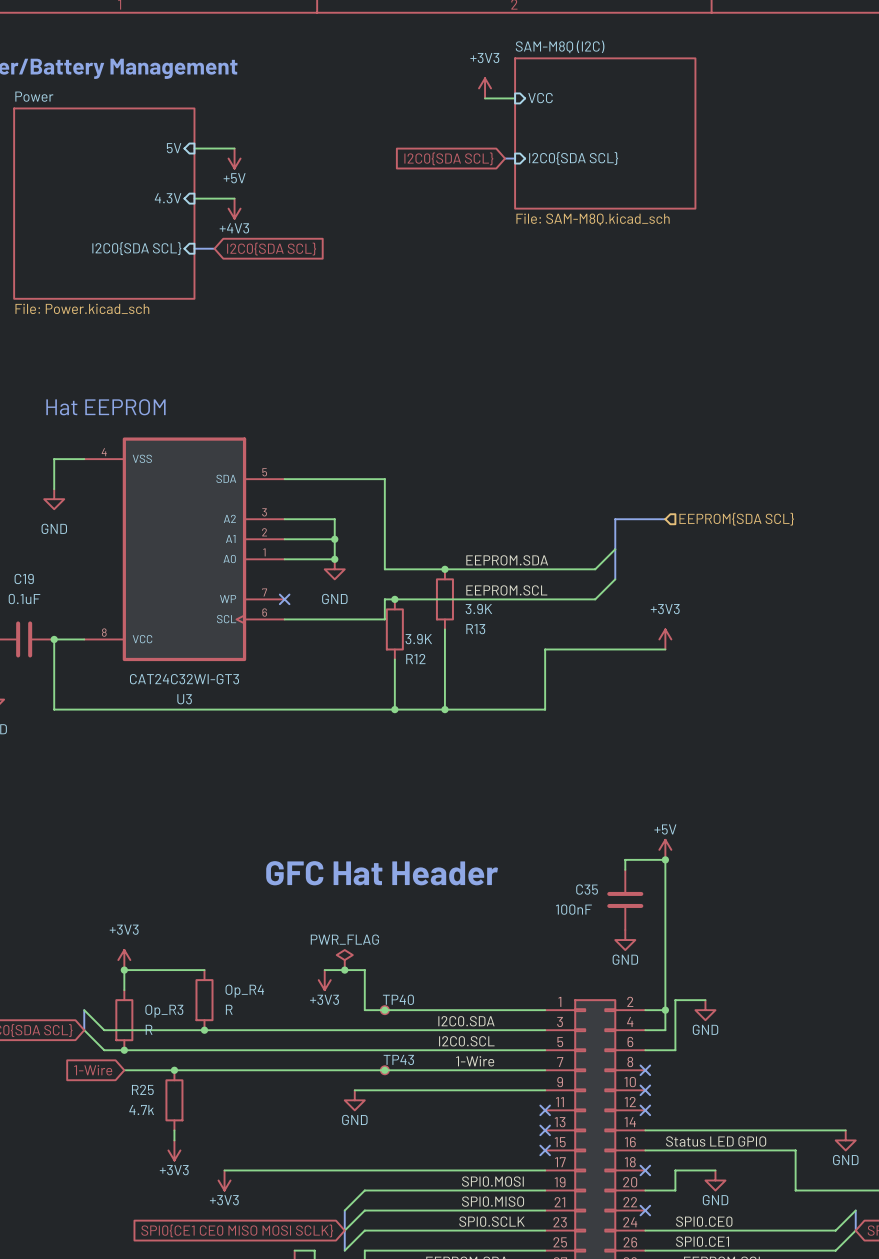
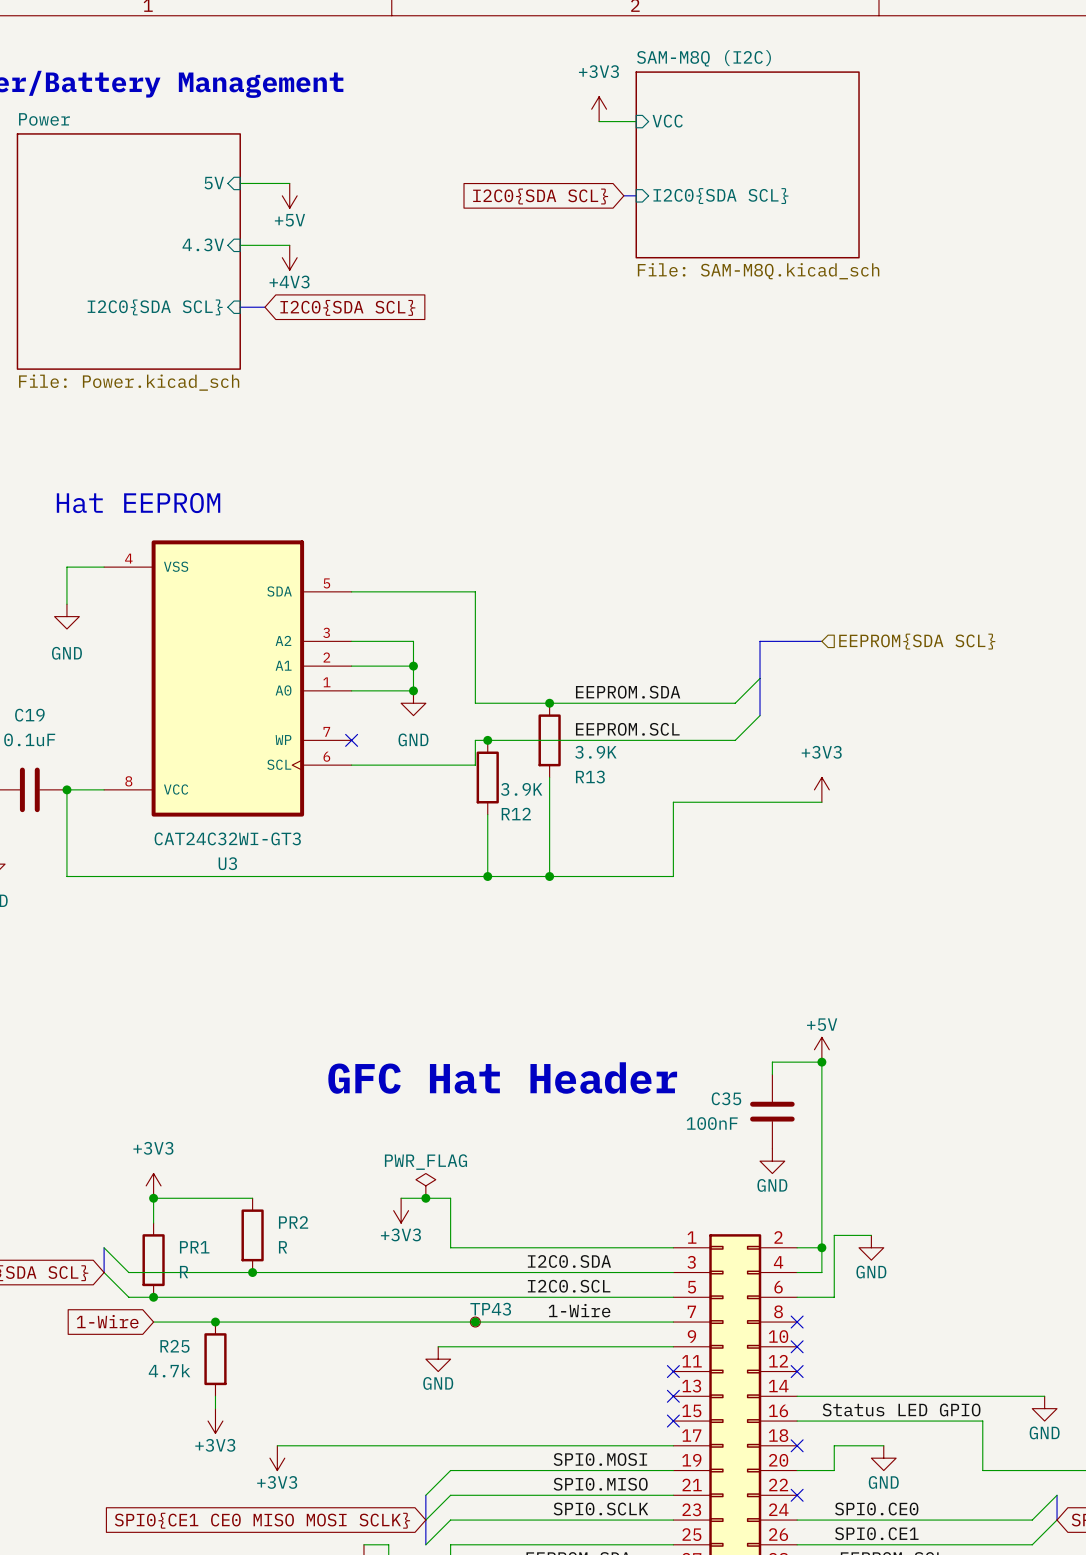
Op_R4 name: Op_R4 (244, 991) -> PR2 (293, 1222)
junction: (384, 1010) -> none
TP40: (384, 1010) -> none
Op_R3 name: Op_R3 (164, 1011) -> PR1 (194, 1247)

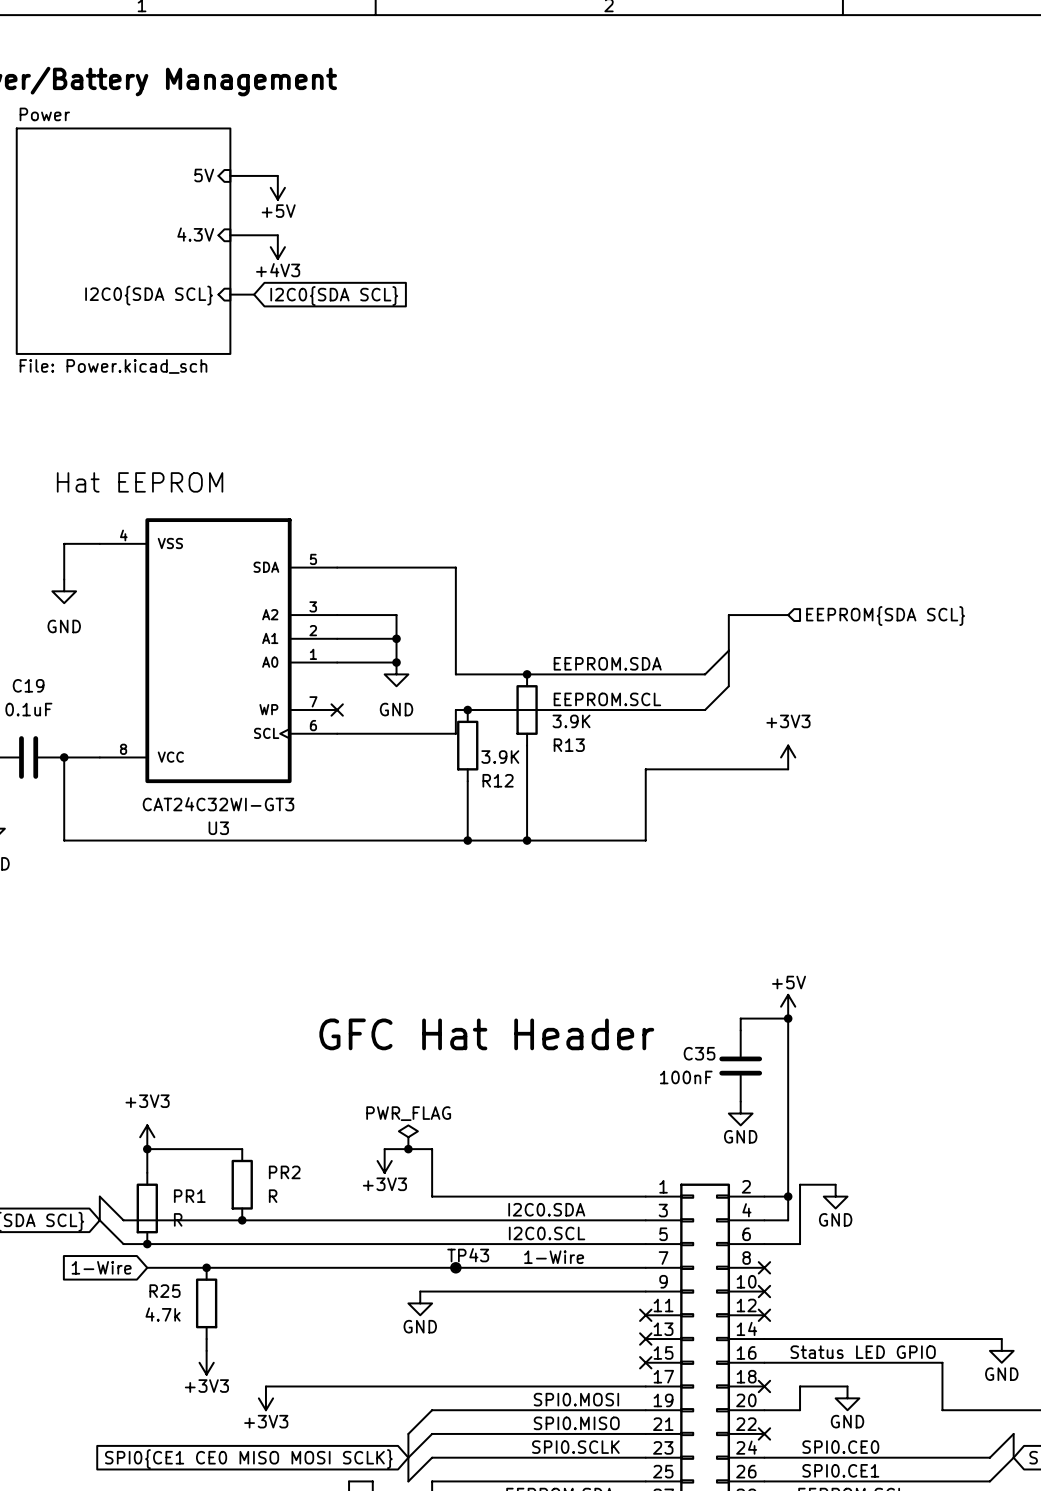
power symbol: +3V3 (599, 109) -> none
wire: (599, 121) (636, 121) -> none
sheet pin: VCC (667, 121) -> none
sheet SAM-M8Q (I2C): File: SAM-M8Q.kicad_sch (747, 164) -> none
bus: (623, 195) (636, 195) -> none
global label: I2C0{SDA SCL} (540, 196) -> none
sheet pin: I2C0{SDA SCL} (720, 196) -> none

